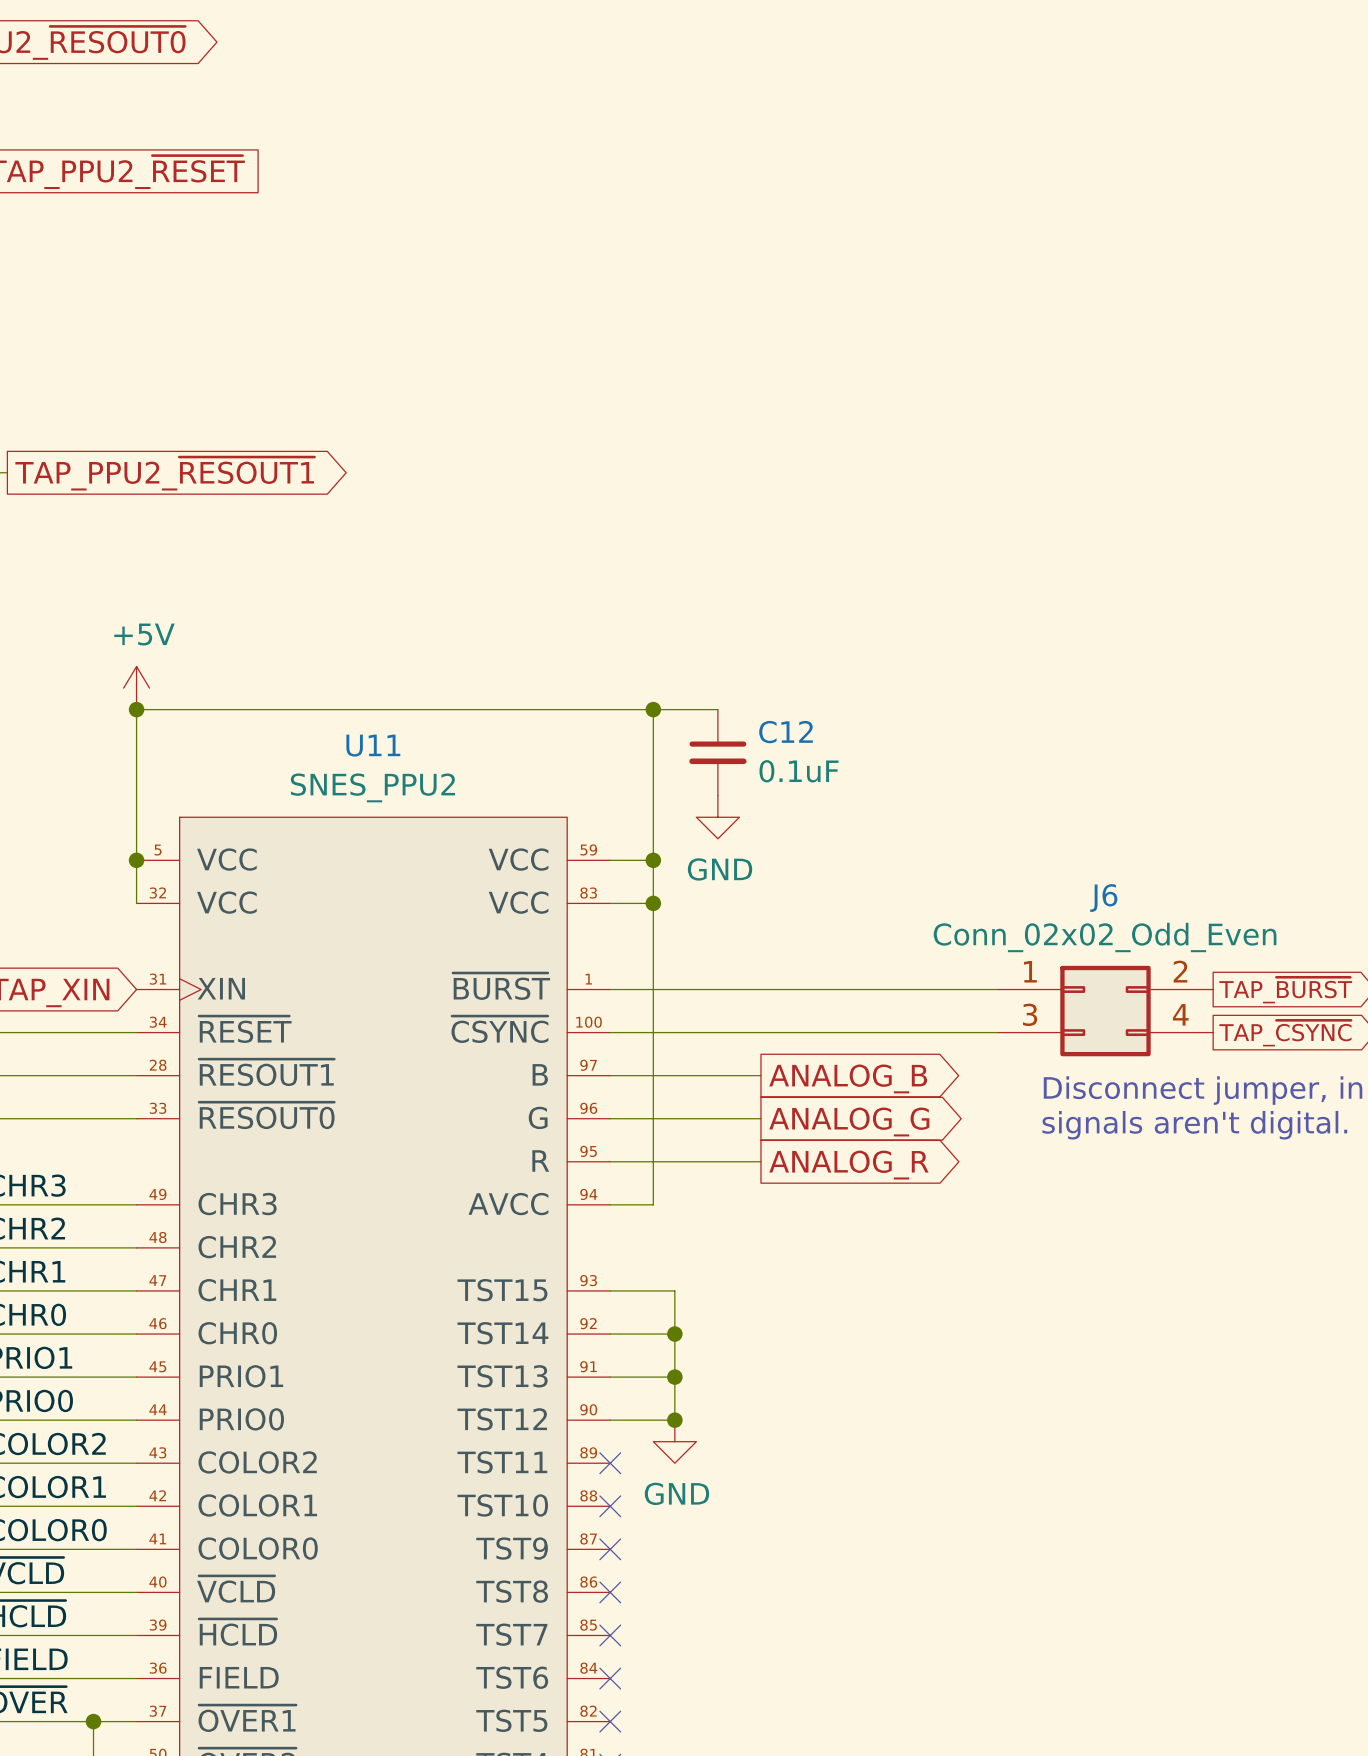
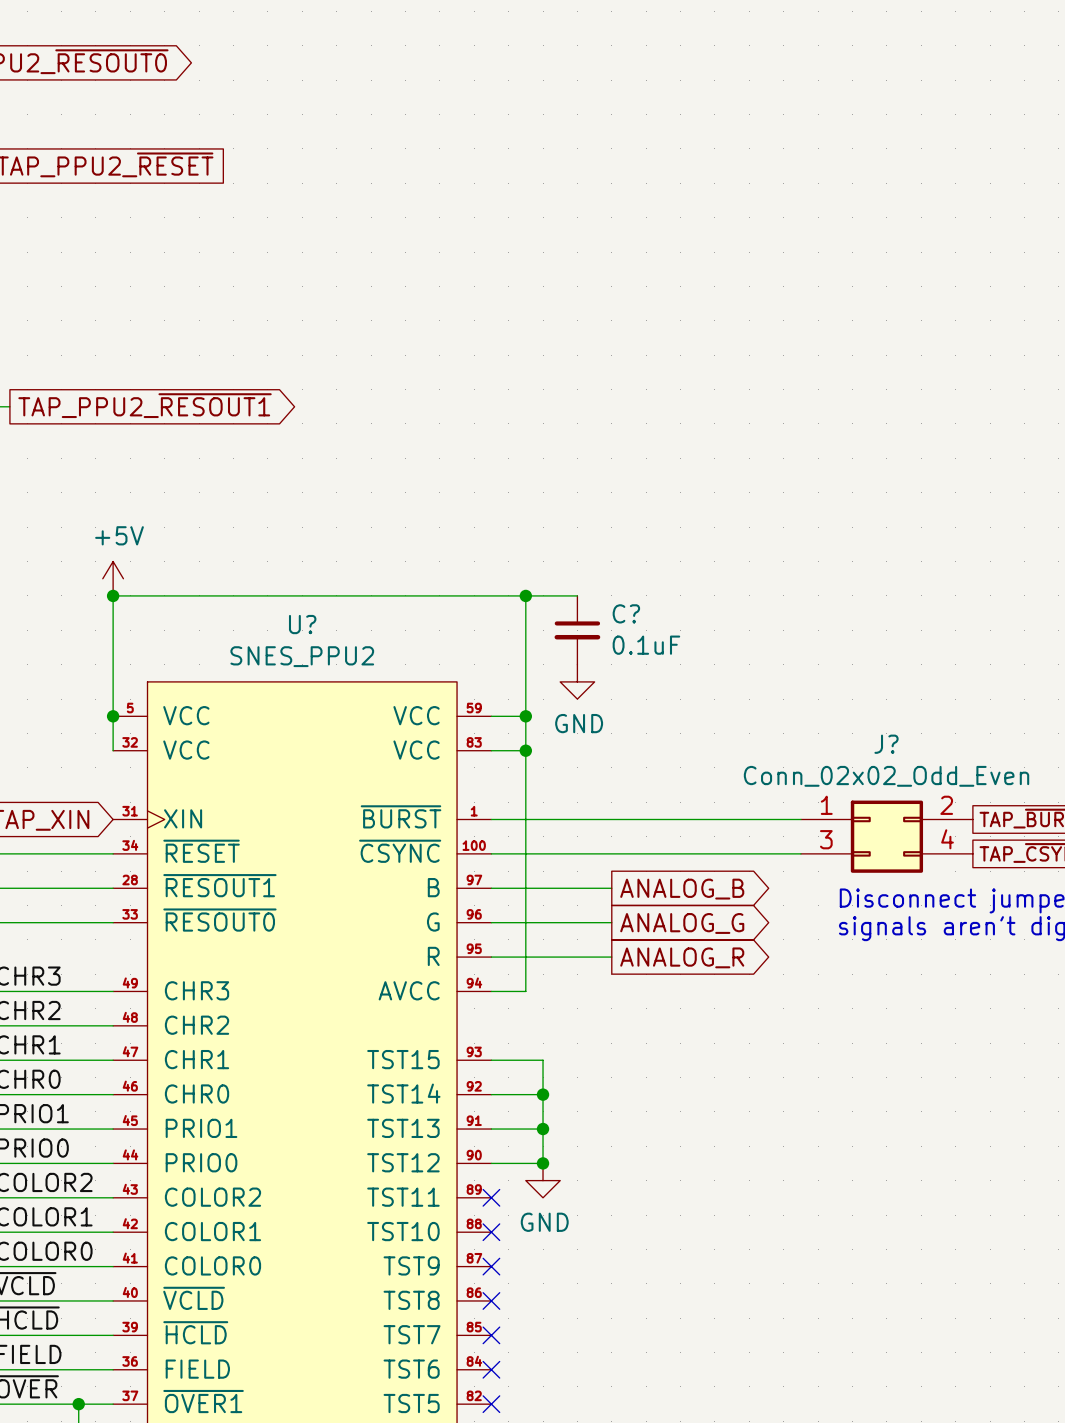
C12 name: C12 (785, 732) -> C? (626, 613)
U11 name: U11 (373, 745) -> U? (302, 624)
J6 name: J6 (1103, 898) -> J? (886, 744)

